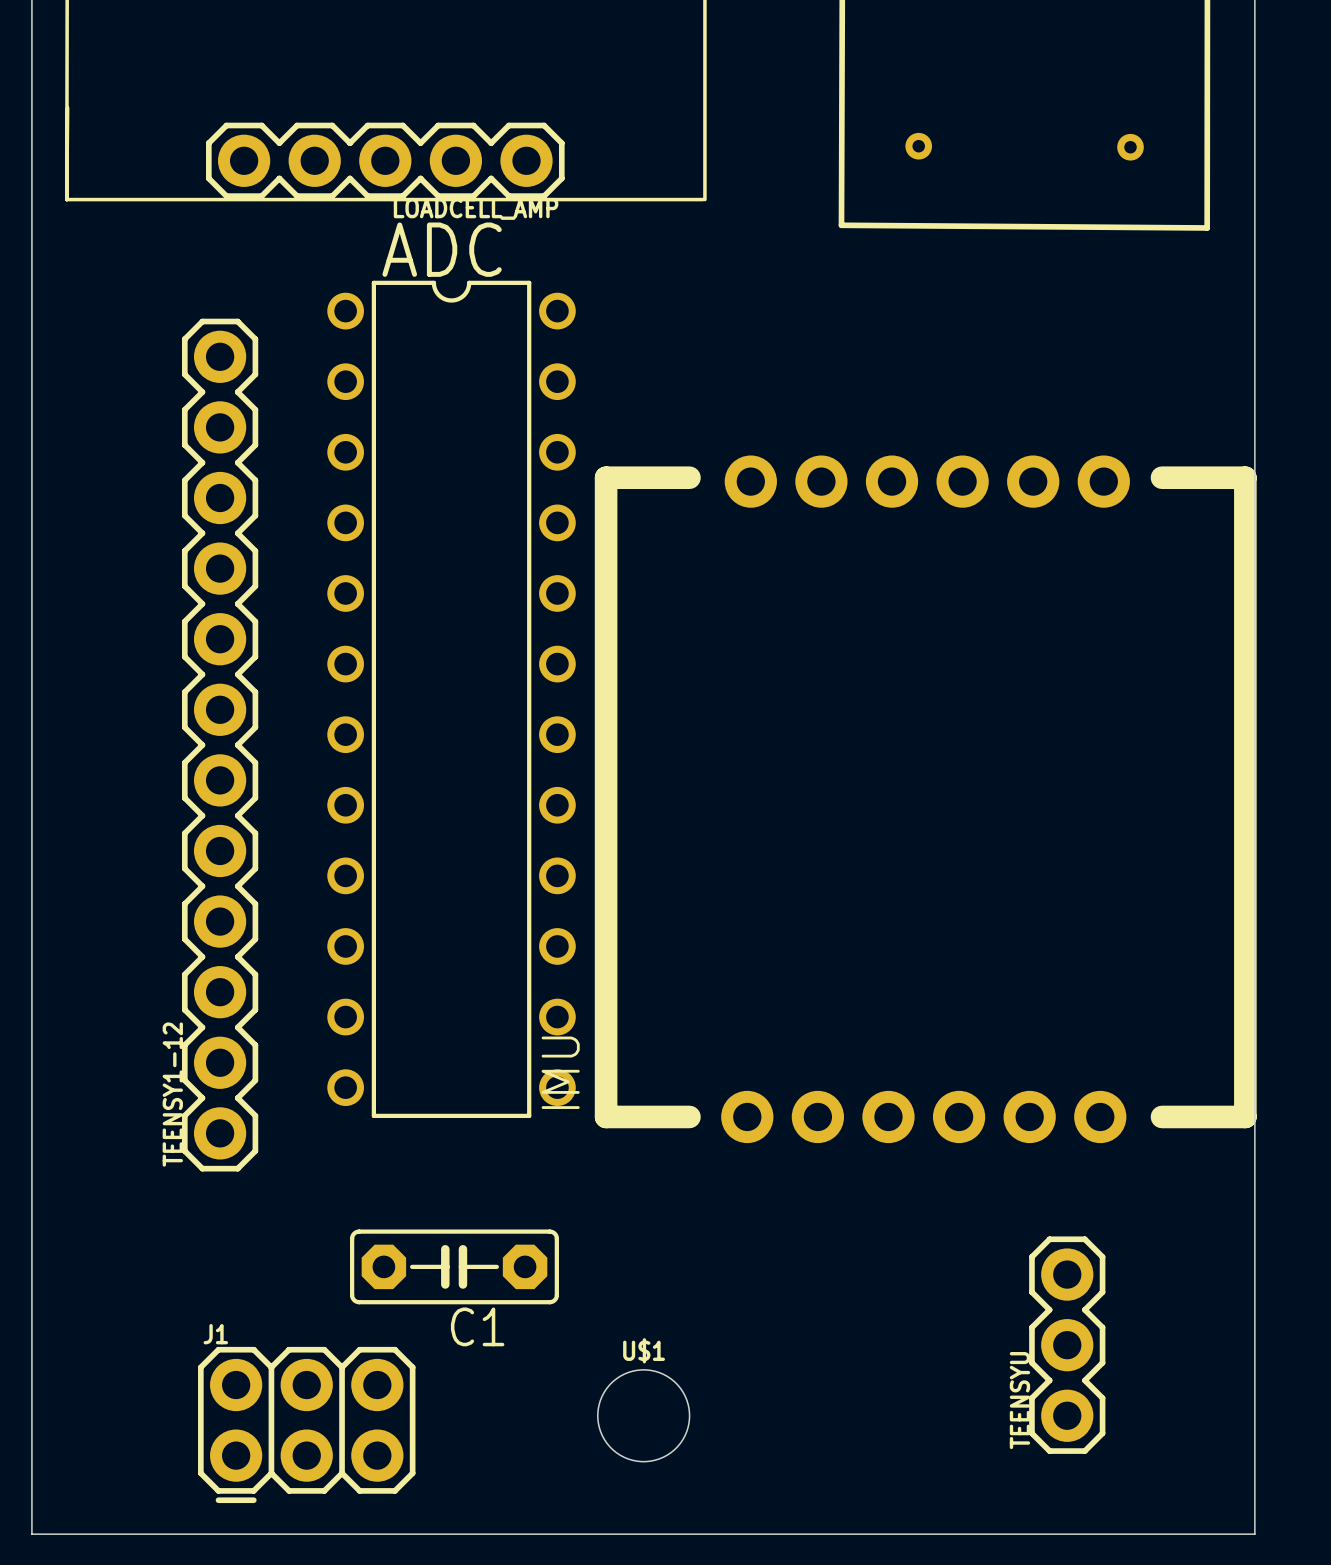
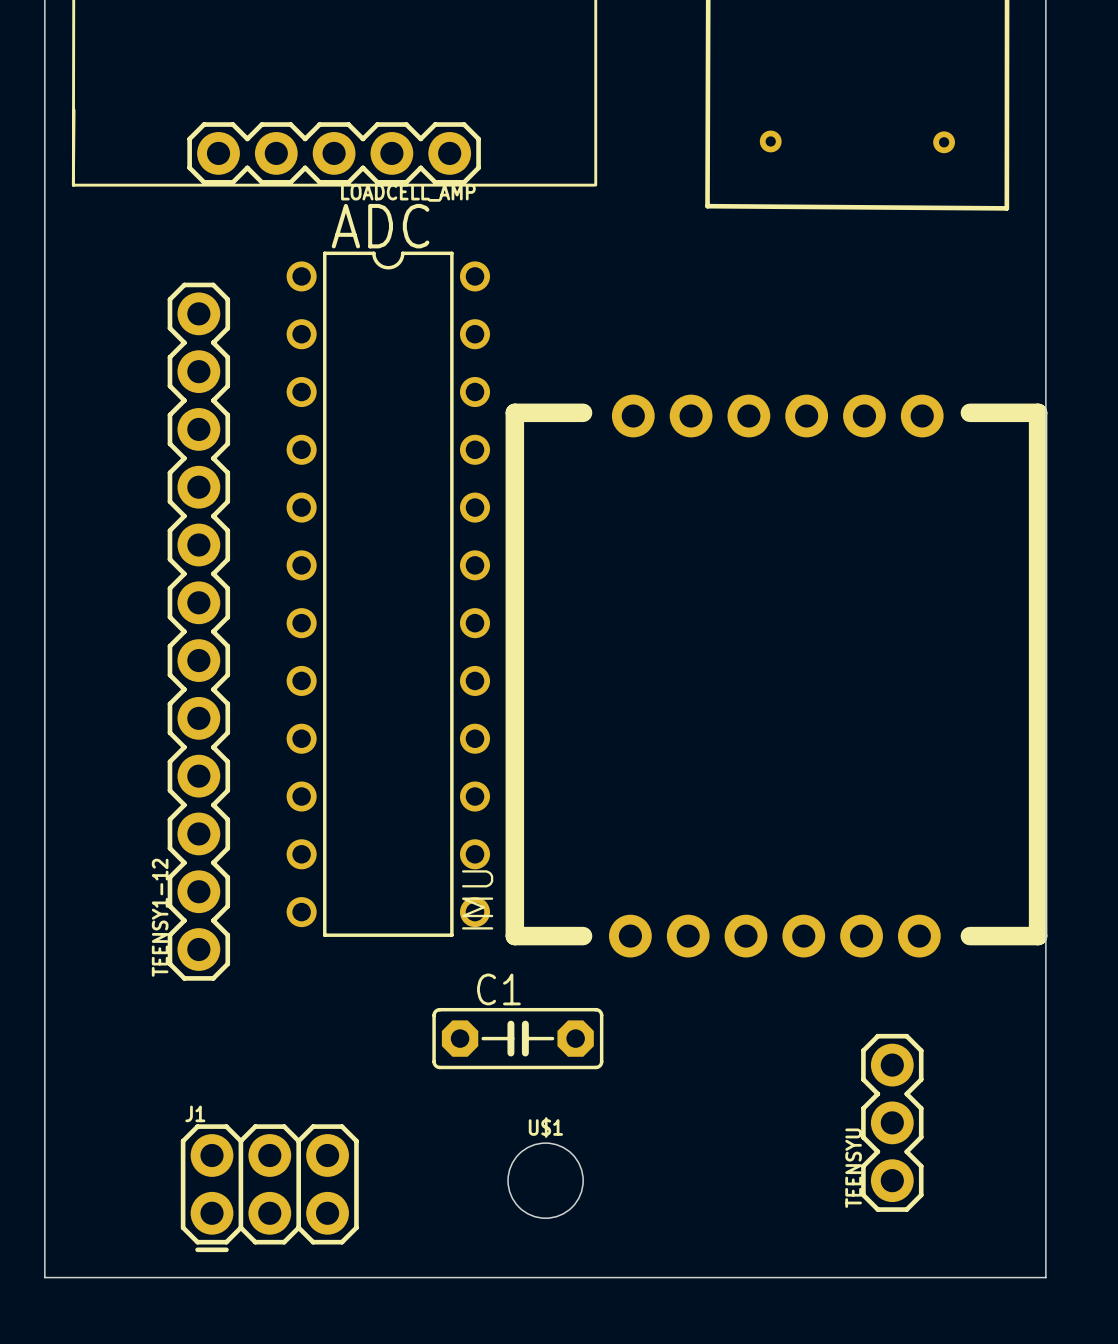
C1 rotation: 0° (454, 1266) -> 180° (517, 1038)
C1 position: (454, 1266) -> (517, 1038)

